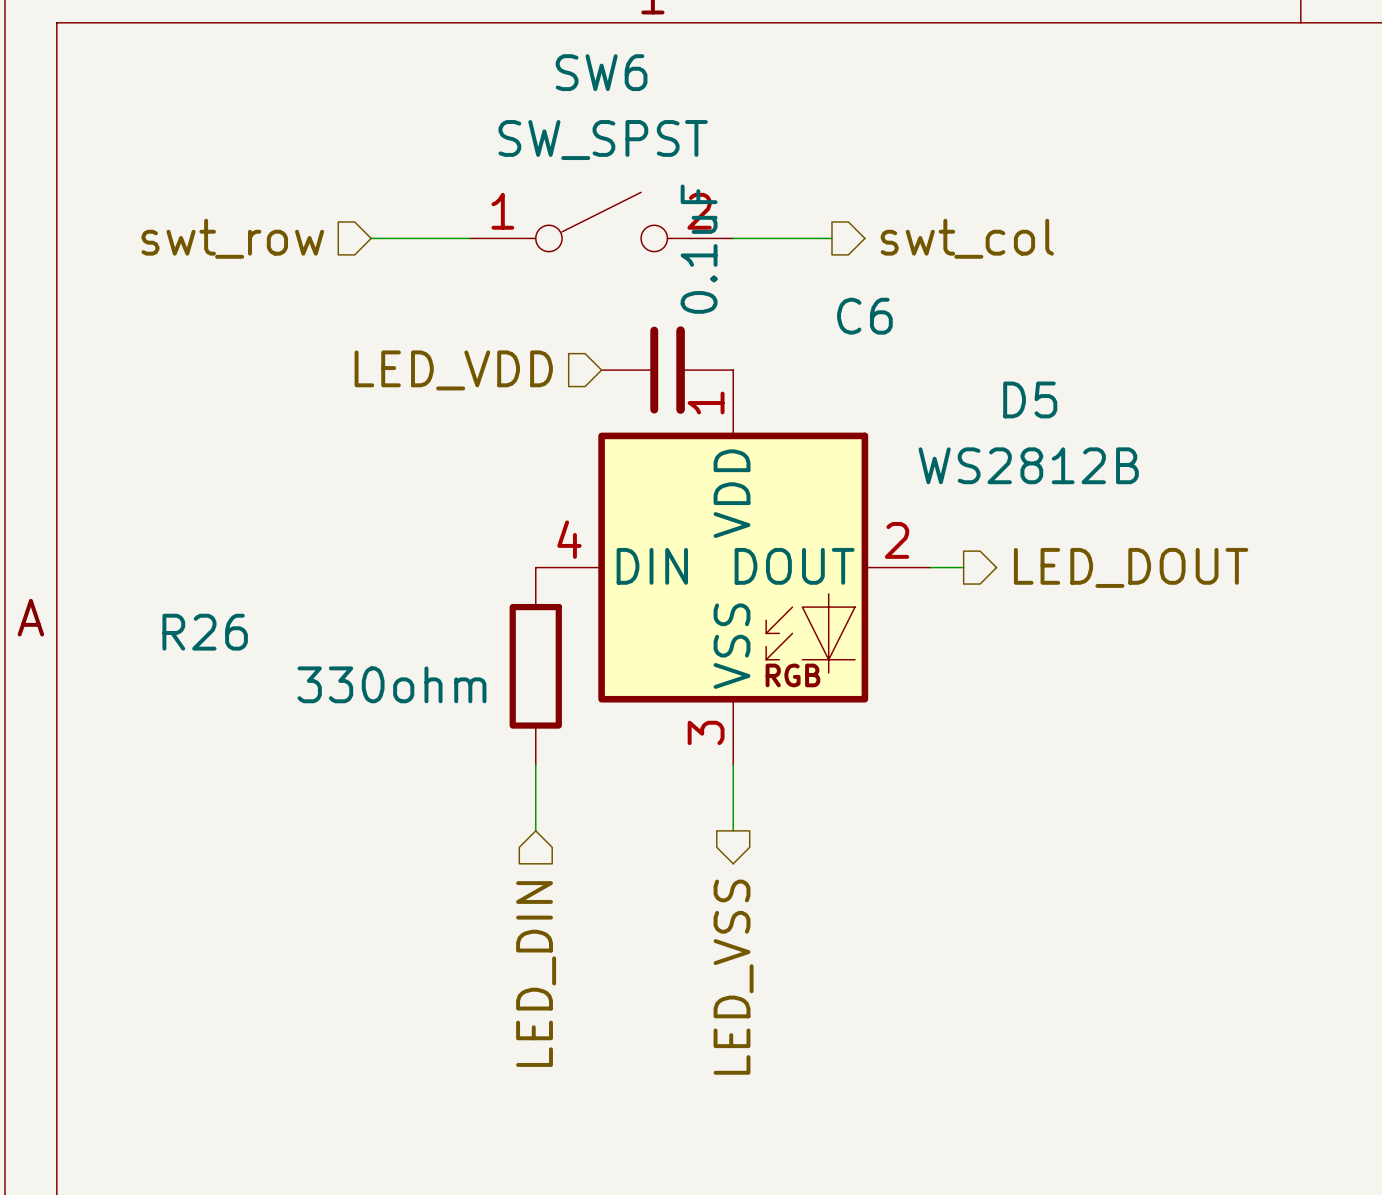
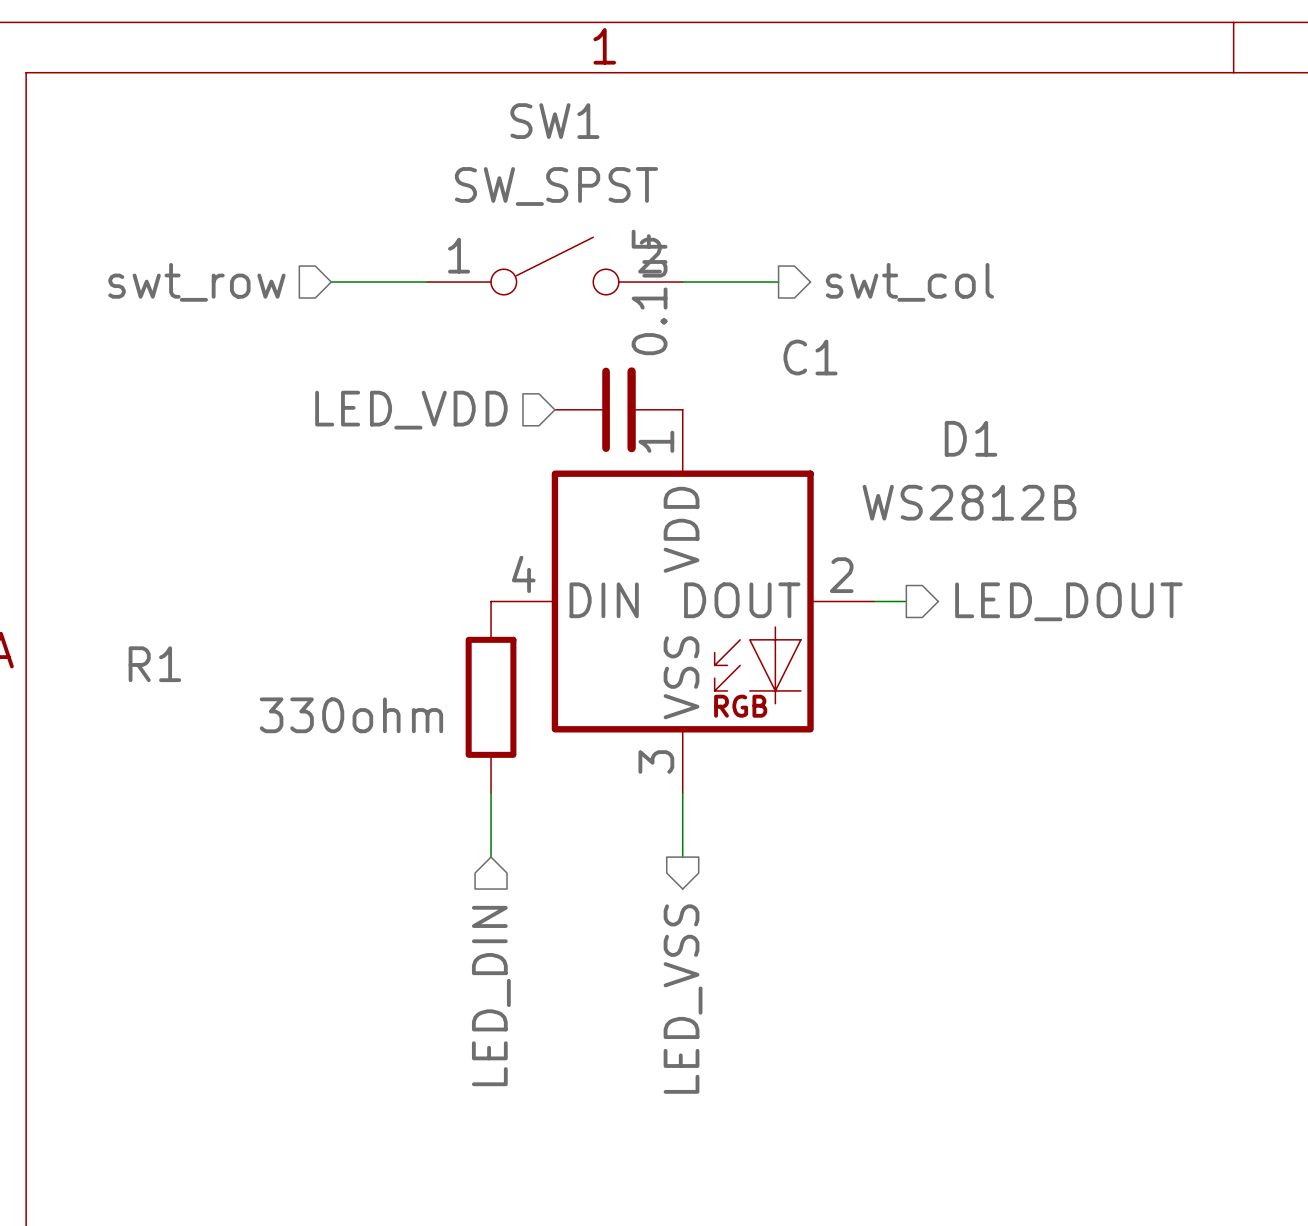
SW6 name: SW6 (601, 72) -> SW1 (554, 121)
C6 name: C6 (864, 316) -> C1 (810, 357)
D5 name: D5 (1030, 399) -> D1 (971, 438)
R26 name: R26 (205, 632) -> R1 (154, 664)

